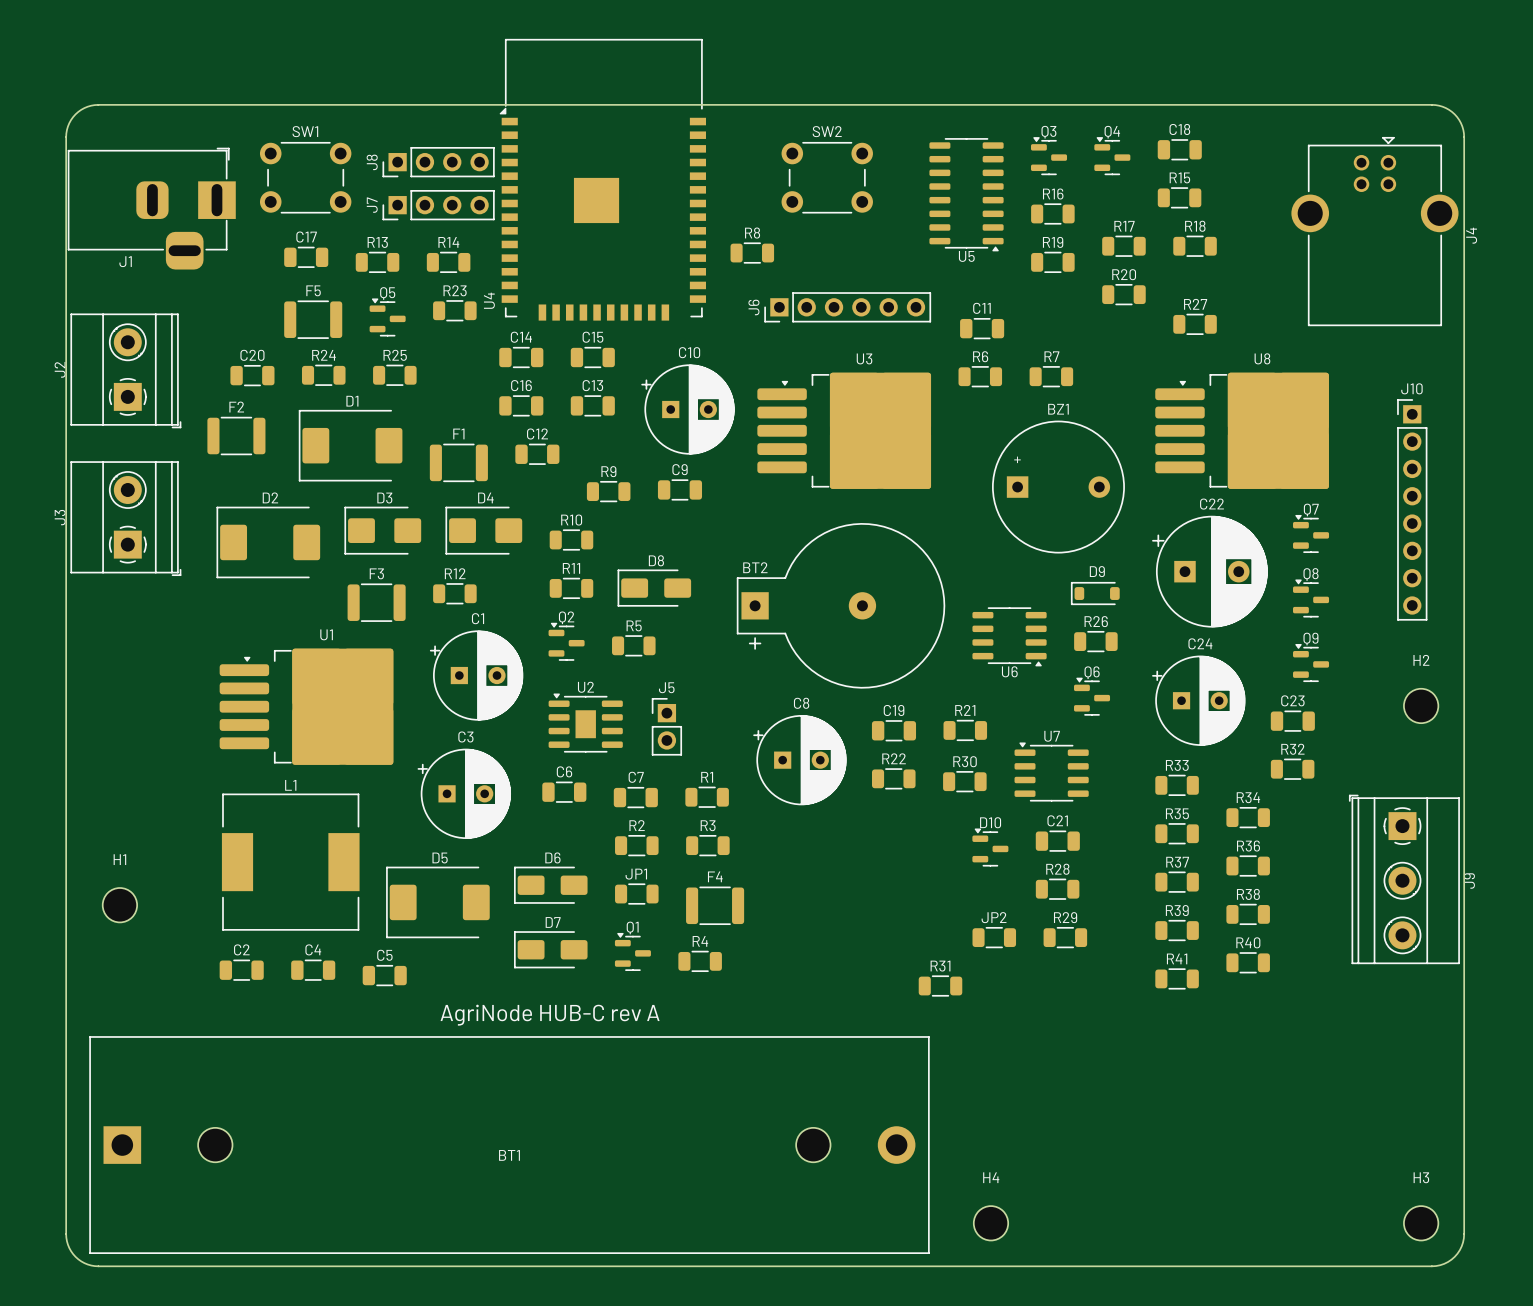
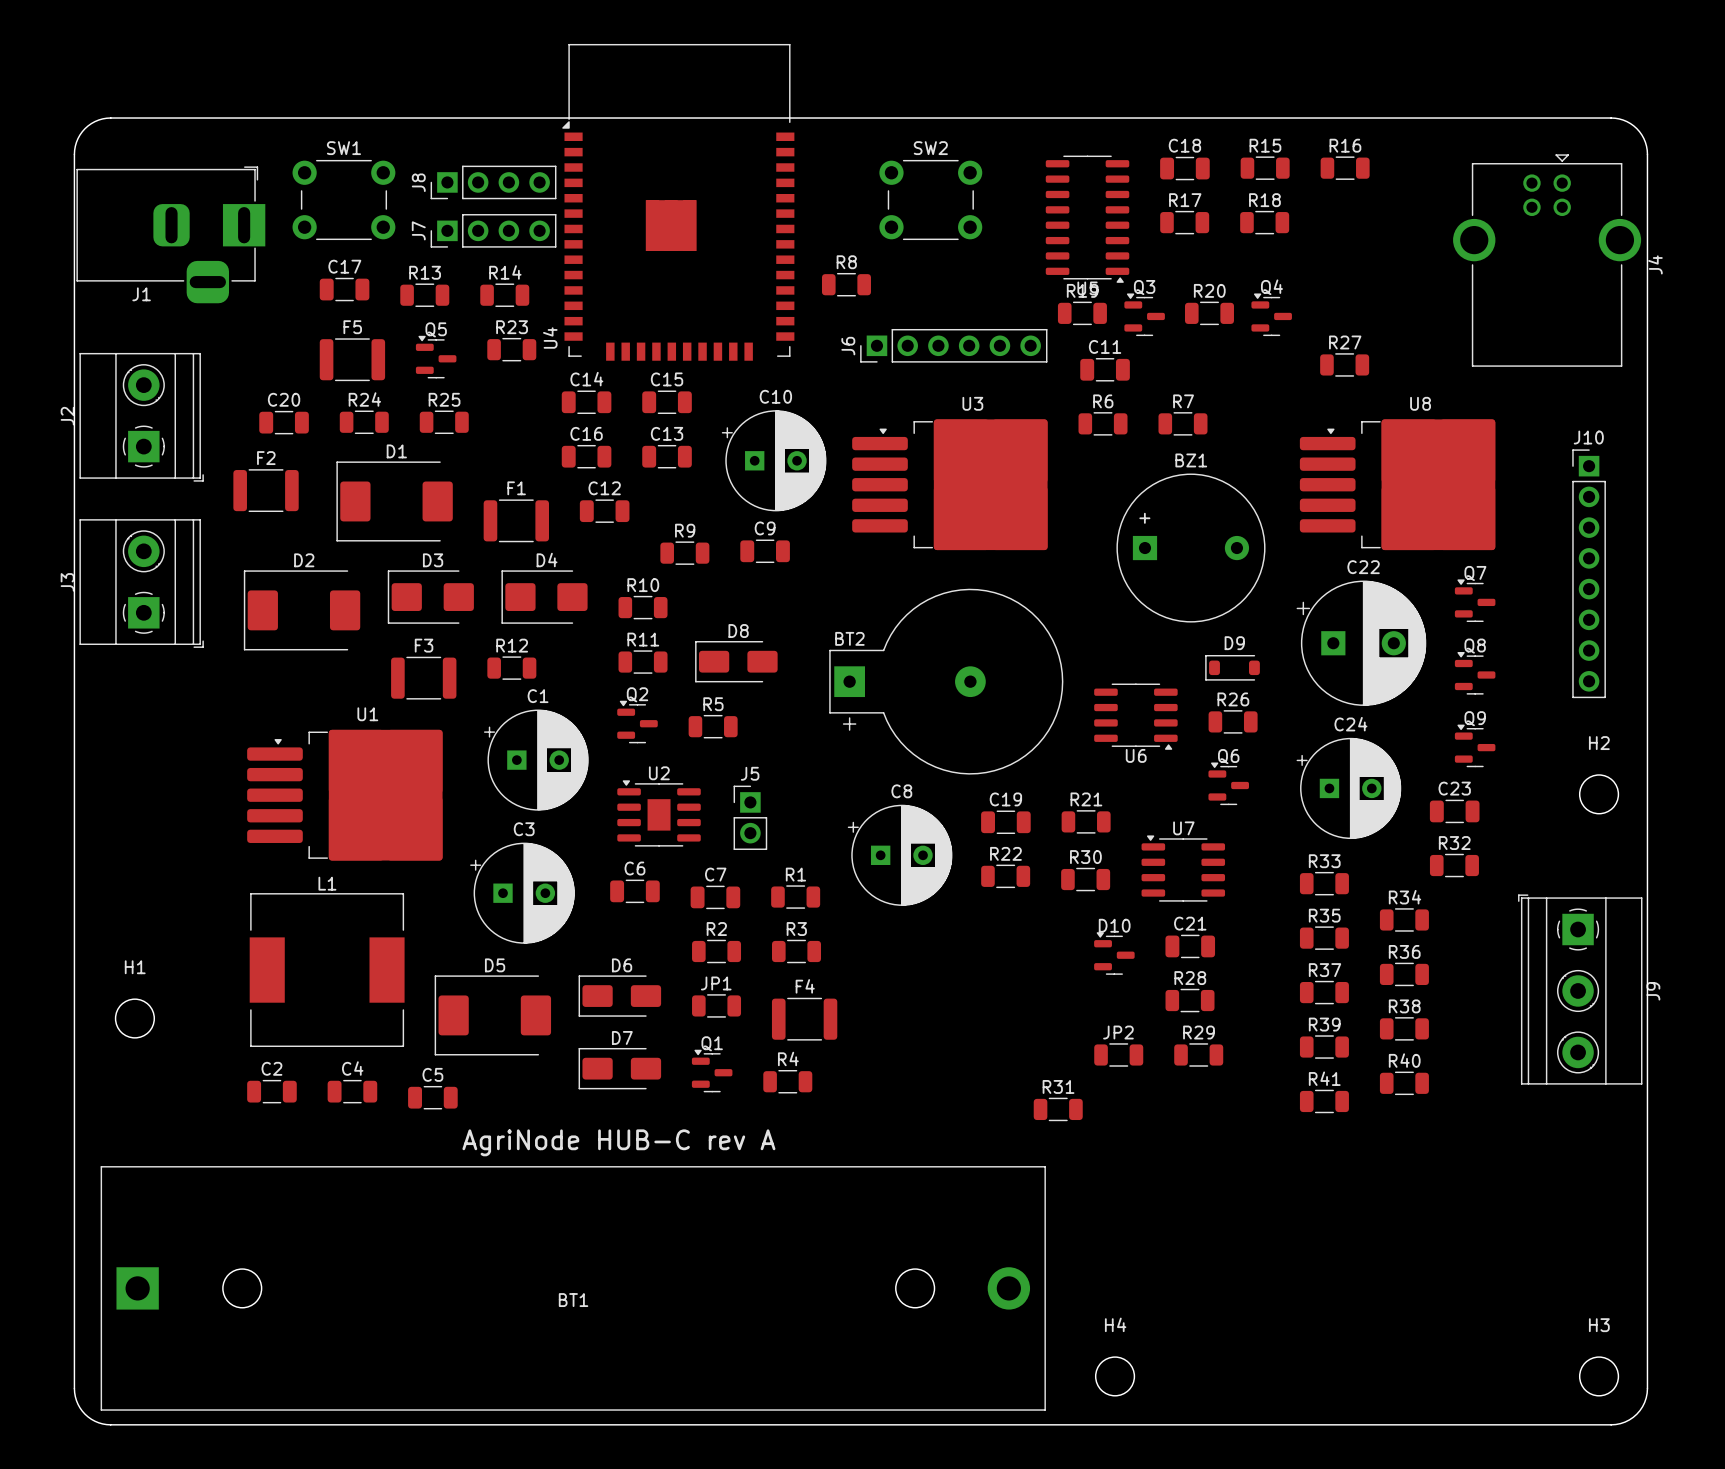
C18 position: (1179, 149) -> (1184, 168)
Q3 position: (1049, 156) -> (1144, 314)
Q4 position: (1112, 156) -> (1271, 314)
R15 position: (1179, 197) -> (1265, 168)
R16 position: (1052, 213) -> (1345, 168)
R17 position: (1123, 246) -> (1184, 222)
R18 position: (1195, 246) -> (1264, 222)
R19 position: (1052, 262) -> (1082, 313)
R20 position: (1123, 294) -> (1209, 313)

